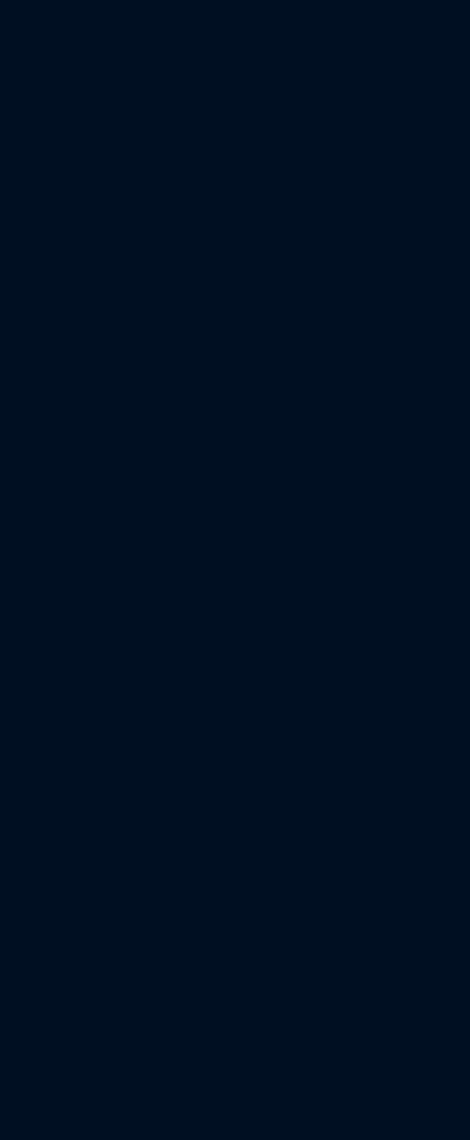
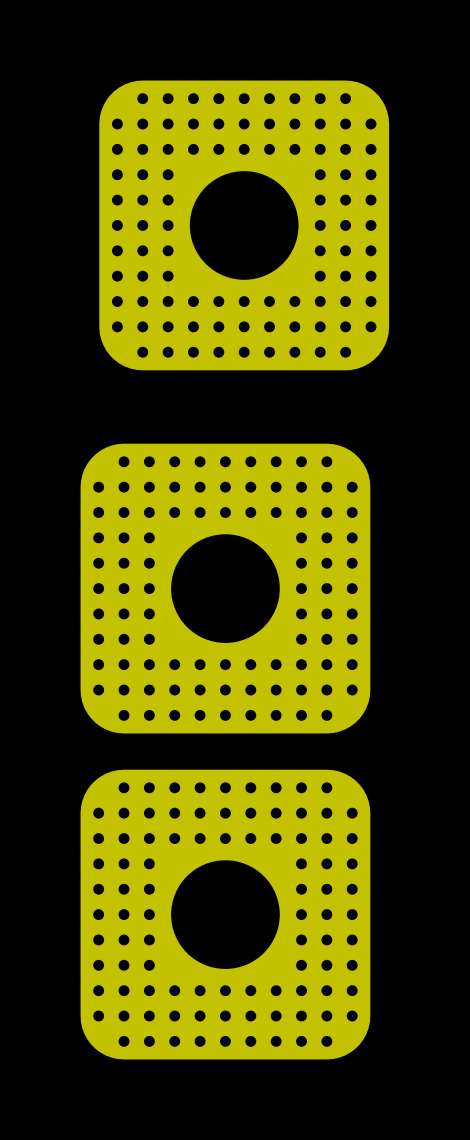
part: none -> (244, 225)
part: none -> (225, 588)
part: none -> (225, 914)

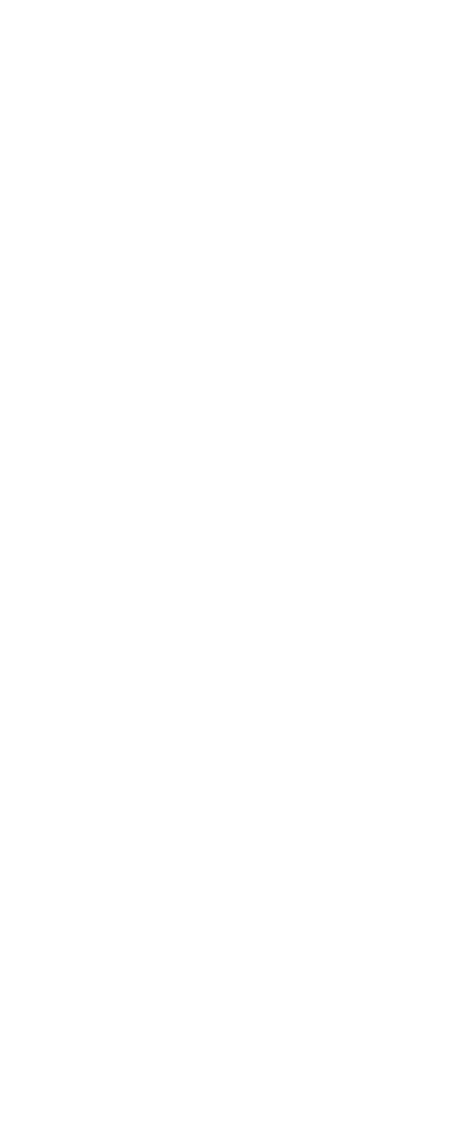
part: (244, 225) -> none
part: (225, 588) -> none
part: (225, 914) -> none

